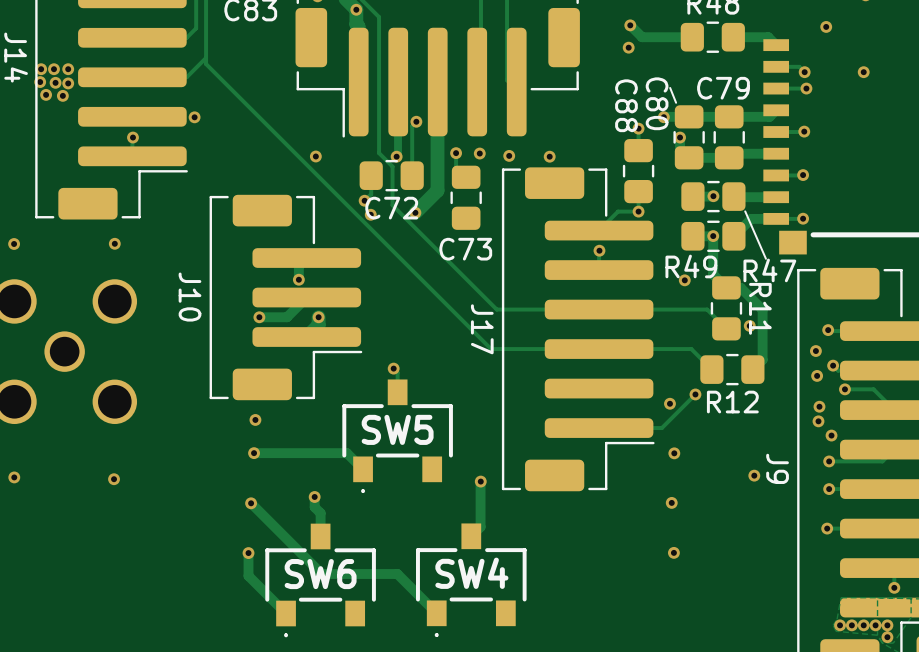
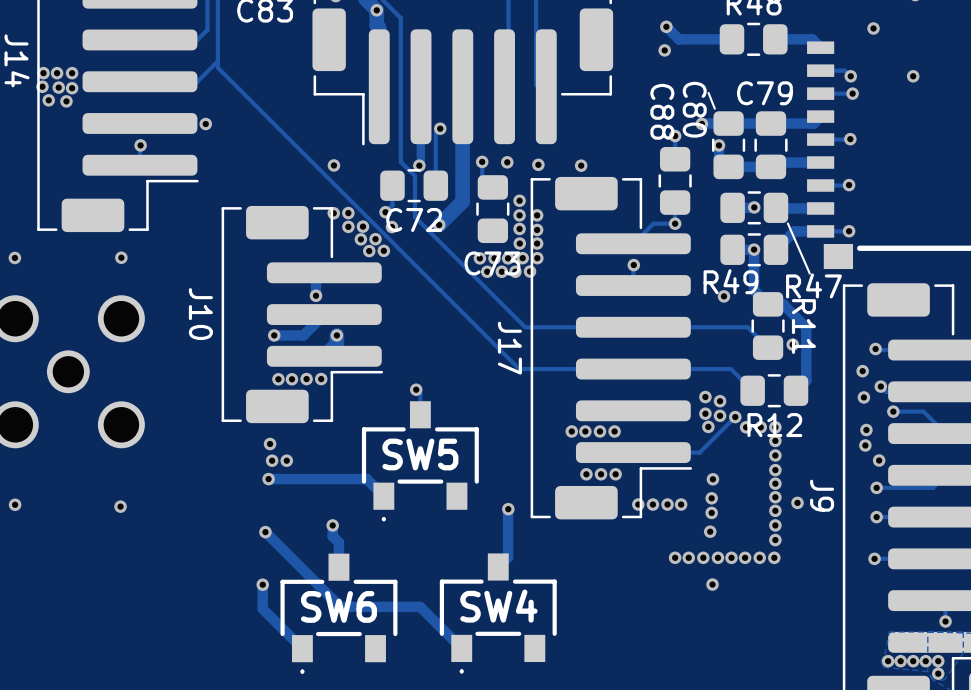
via: none -> (519, 200)
via: none -> (333, 213)
via: none -> (348, 213)
via: none -> (519, 215)
via: none -> (537, 215)
via: none -> (348, 226)
via: none -> (362, 226)
via: none -> (519, 228)
via: none -> (537, 229)
via: none -> (360, 239)
via: none -> (375, 239)
via: none -> (519, 243)
via: none -> (537, 243)
via: none -> (369, 251)
via: none -> (383, 250)
via: none -> (479, 258)
via: none -> (494, 258)
via: none -> (508, 258)
via: none -> (522, 258)
via: none -> (537, 258)
via: none -> (530, 271)
via: none -> (487, 271)
via: none -> (501, 271)
via: none -> (515, 271)
via: none -> (278, 379)
via: none -> (291, 379)
via: none -> (306, 379)
via: none -> (321, 379)
via: none -> (705, 397)
via: none -> (720, 401)
via: none -> (705, 413)
via: none -> (720, 415)
via: none -> (746, 427)
via: none -> (760, 427)
via: none -> (775, 427)
via: none -> (571, 431)
via: none -> (585, 431)
via: none -> (599, 431)
via: none -> (614, 431)
via: none -> (775, 440)
via: none -> (775, 455)
via: none -> (272, 460)
via: none -> (286, 460)
via: none -> (775, 470)
via: none -> (586, 474)
via: none -> (601, 474)
via: none -> (615, 474)
via: none -> (775, 483)
via: none -> (775, 497)
via: none -> (711, 498)
via: none -> (638, 504)
via: none -> (652, 504)
via: none -> (667, 504)
via: none -> (681, 504)
via: none -> (775, 510)
via: none -> (711, 512)
via: none -> (775, 525)
via: none -> (775, 540)
via: none -> (675, 557)
via: none -> (688, 557)
via: none -> (703, 557)
via: none -> (717, 557)
via: none -> (731, 557)
via: none -> (745, 557)
via: none -> (759, 557)
via: none -> (774, 557)

